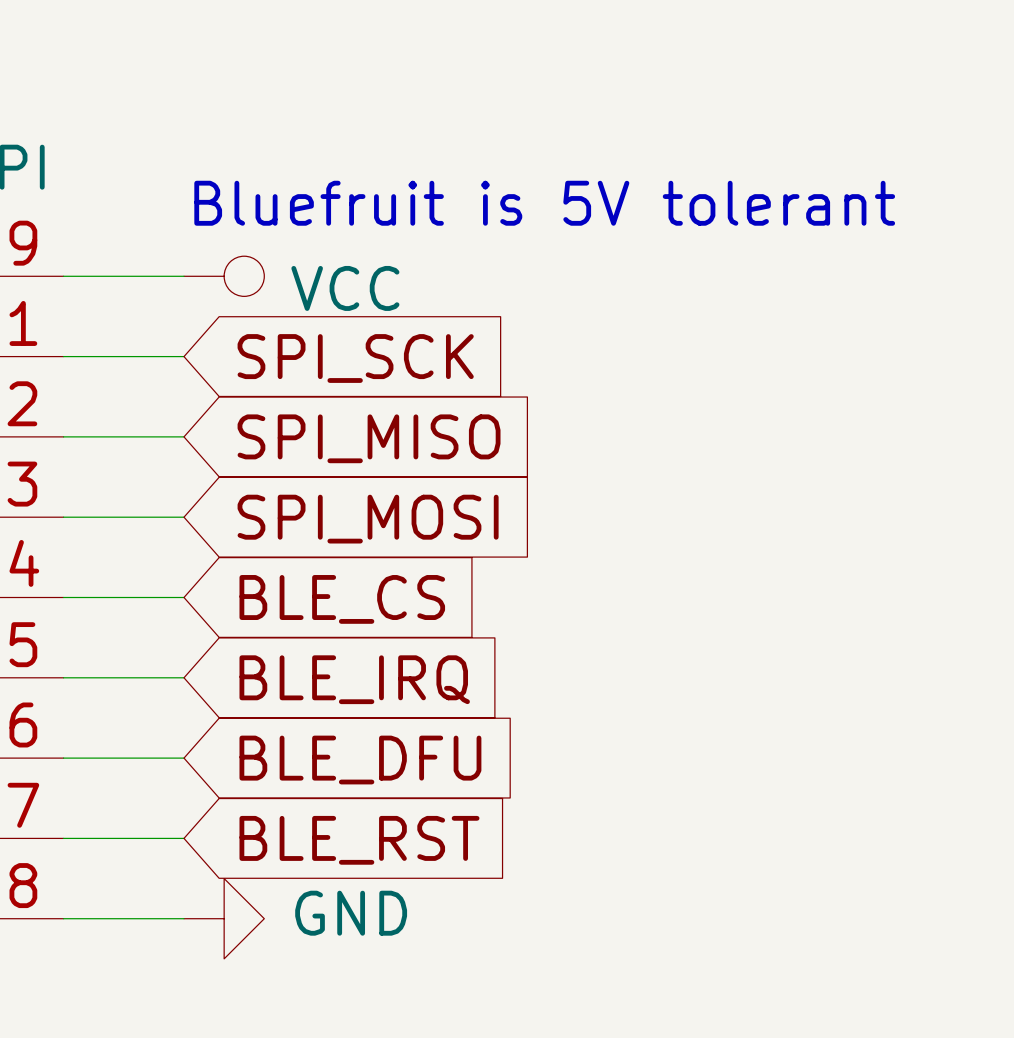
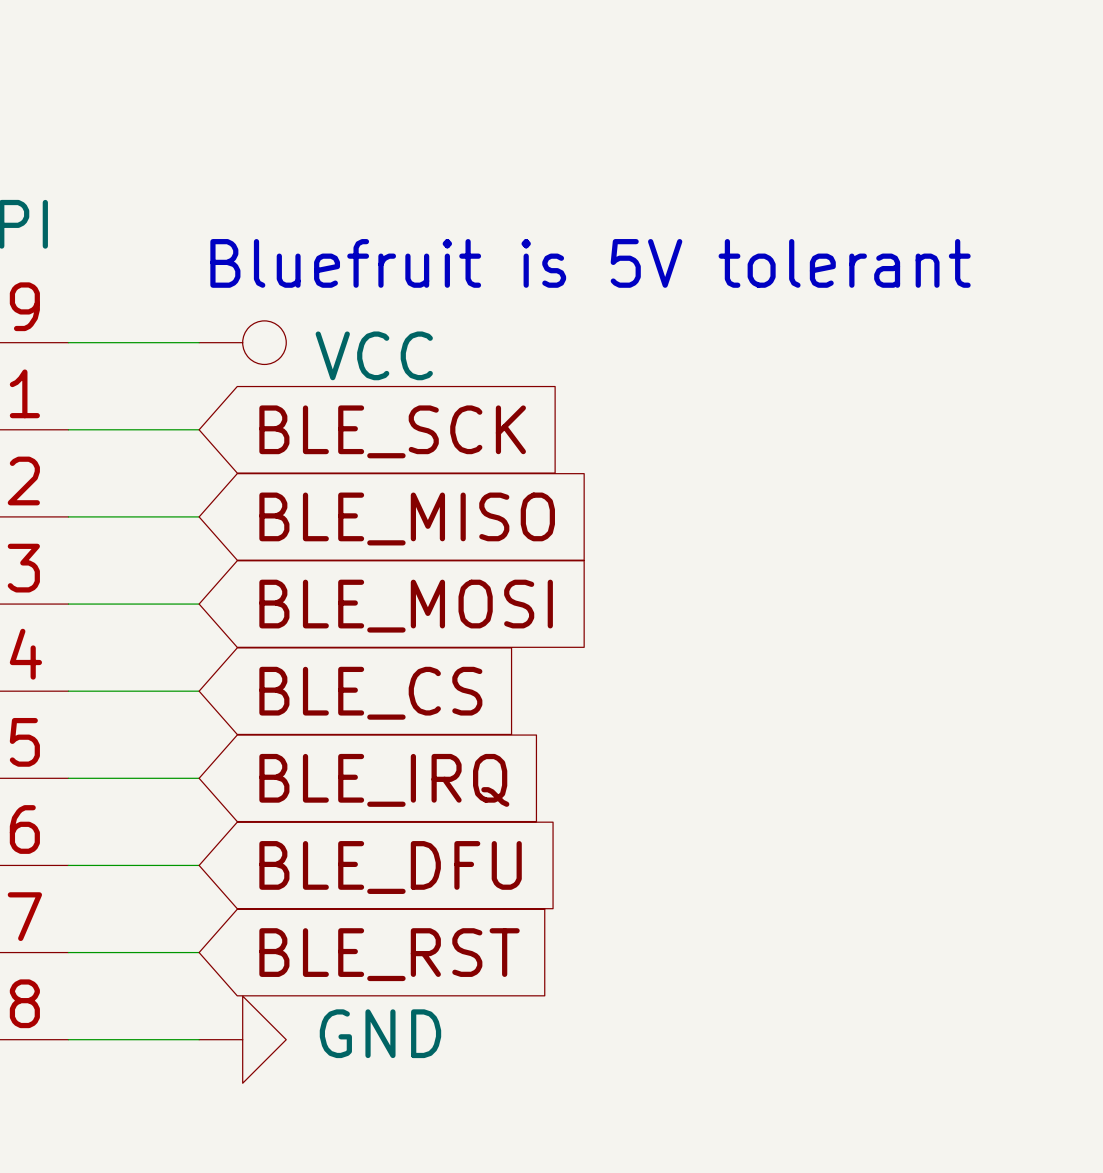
global label: SPI_SCK (355, 358) -> BLE_SCK (392, 431)
global label: SPI_MISO (369, 438) -> BLE_MISO (407, 519)
global label: SPI_MOSI (368, 519) -> BLE_MOSI (406, 606)

